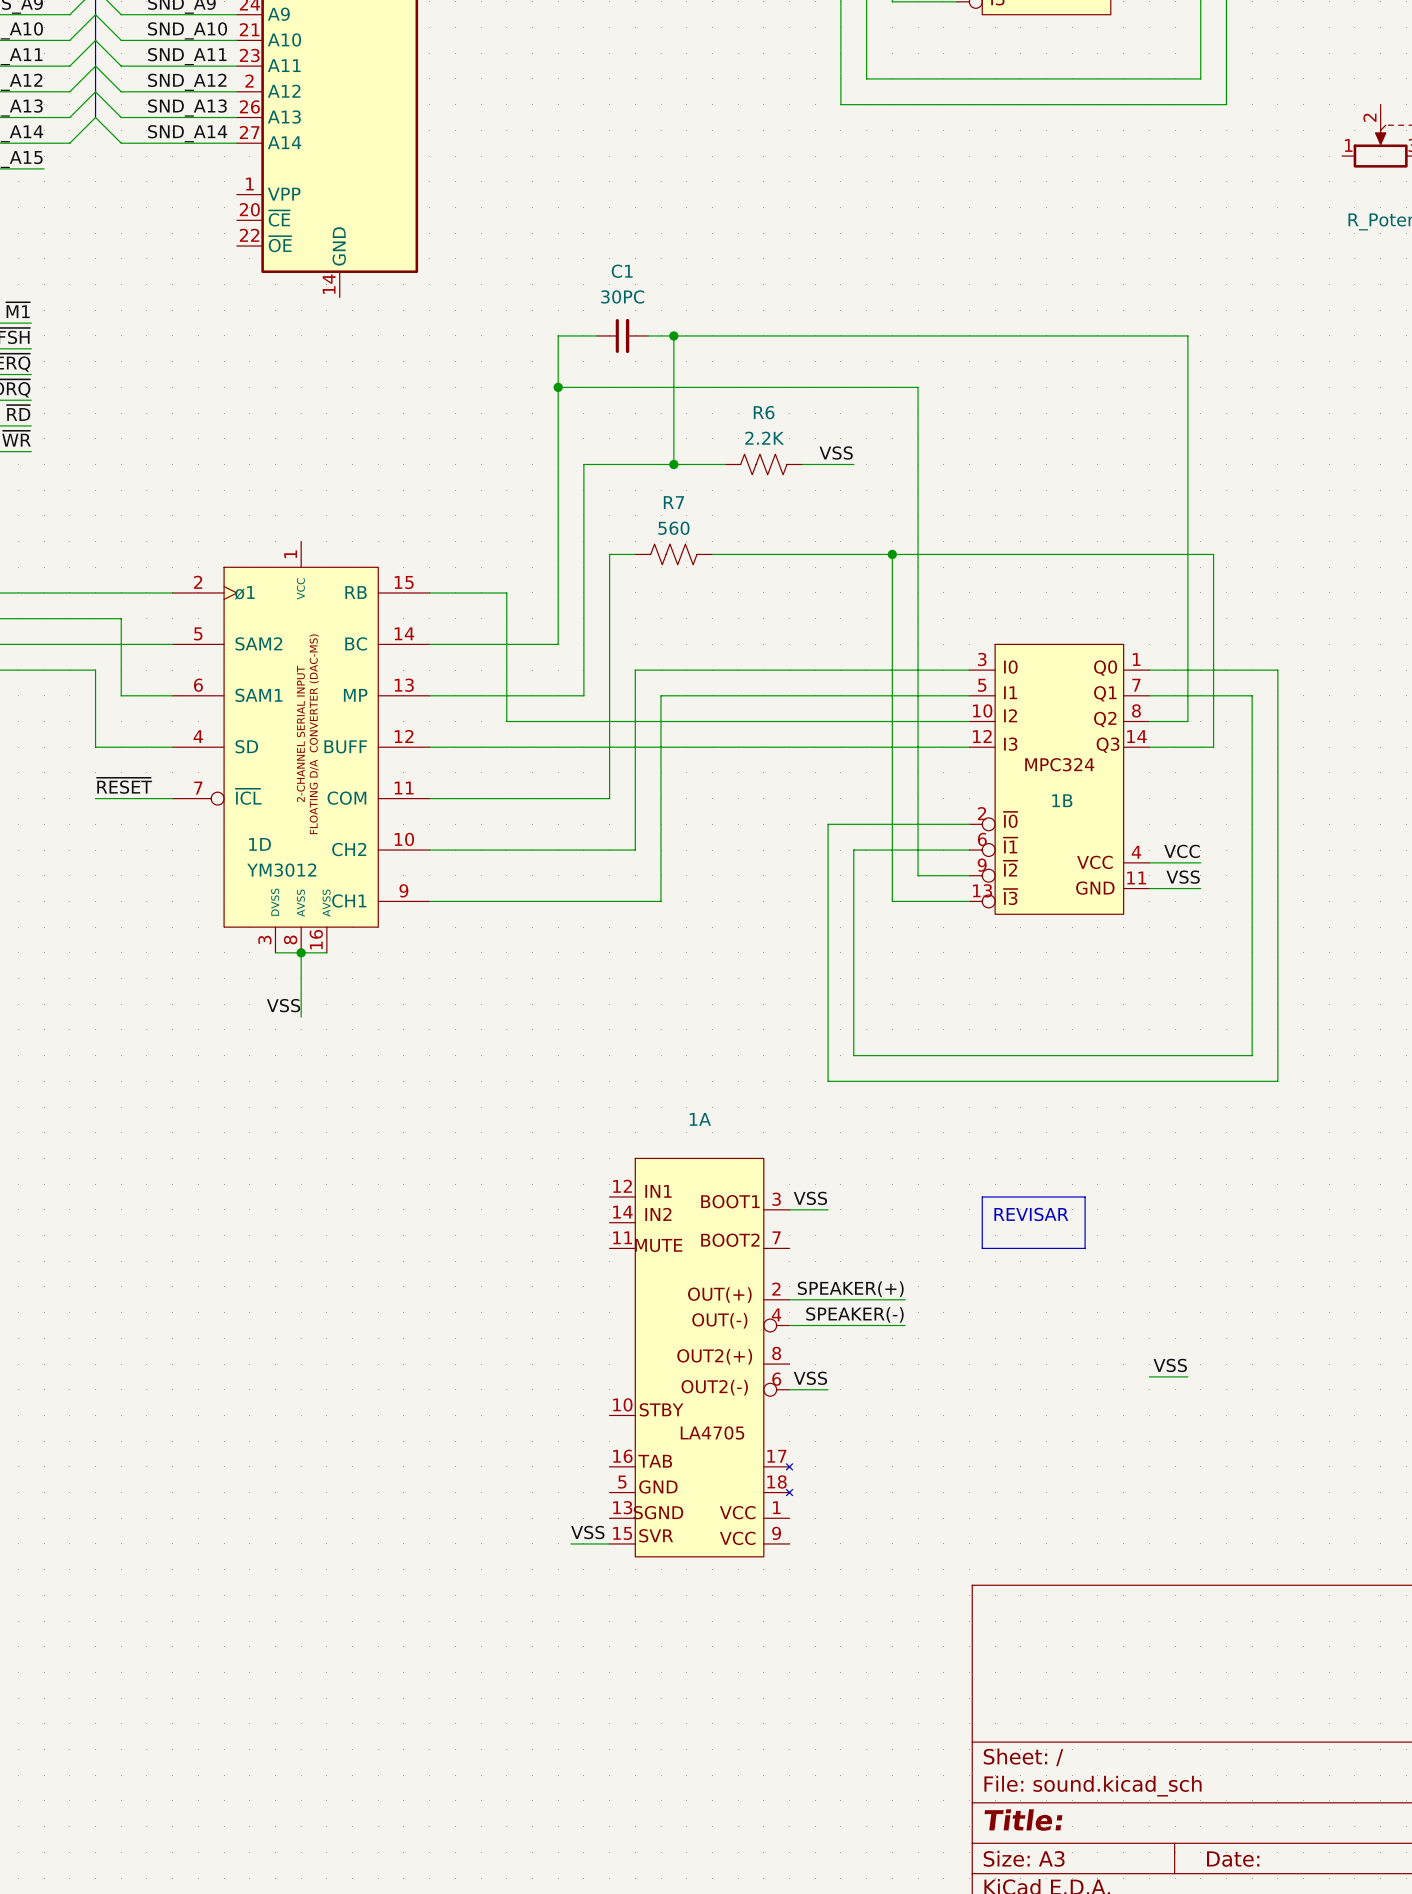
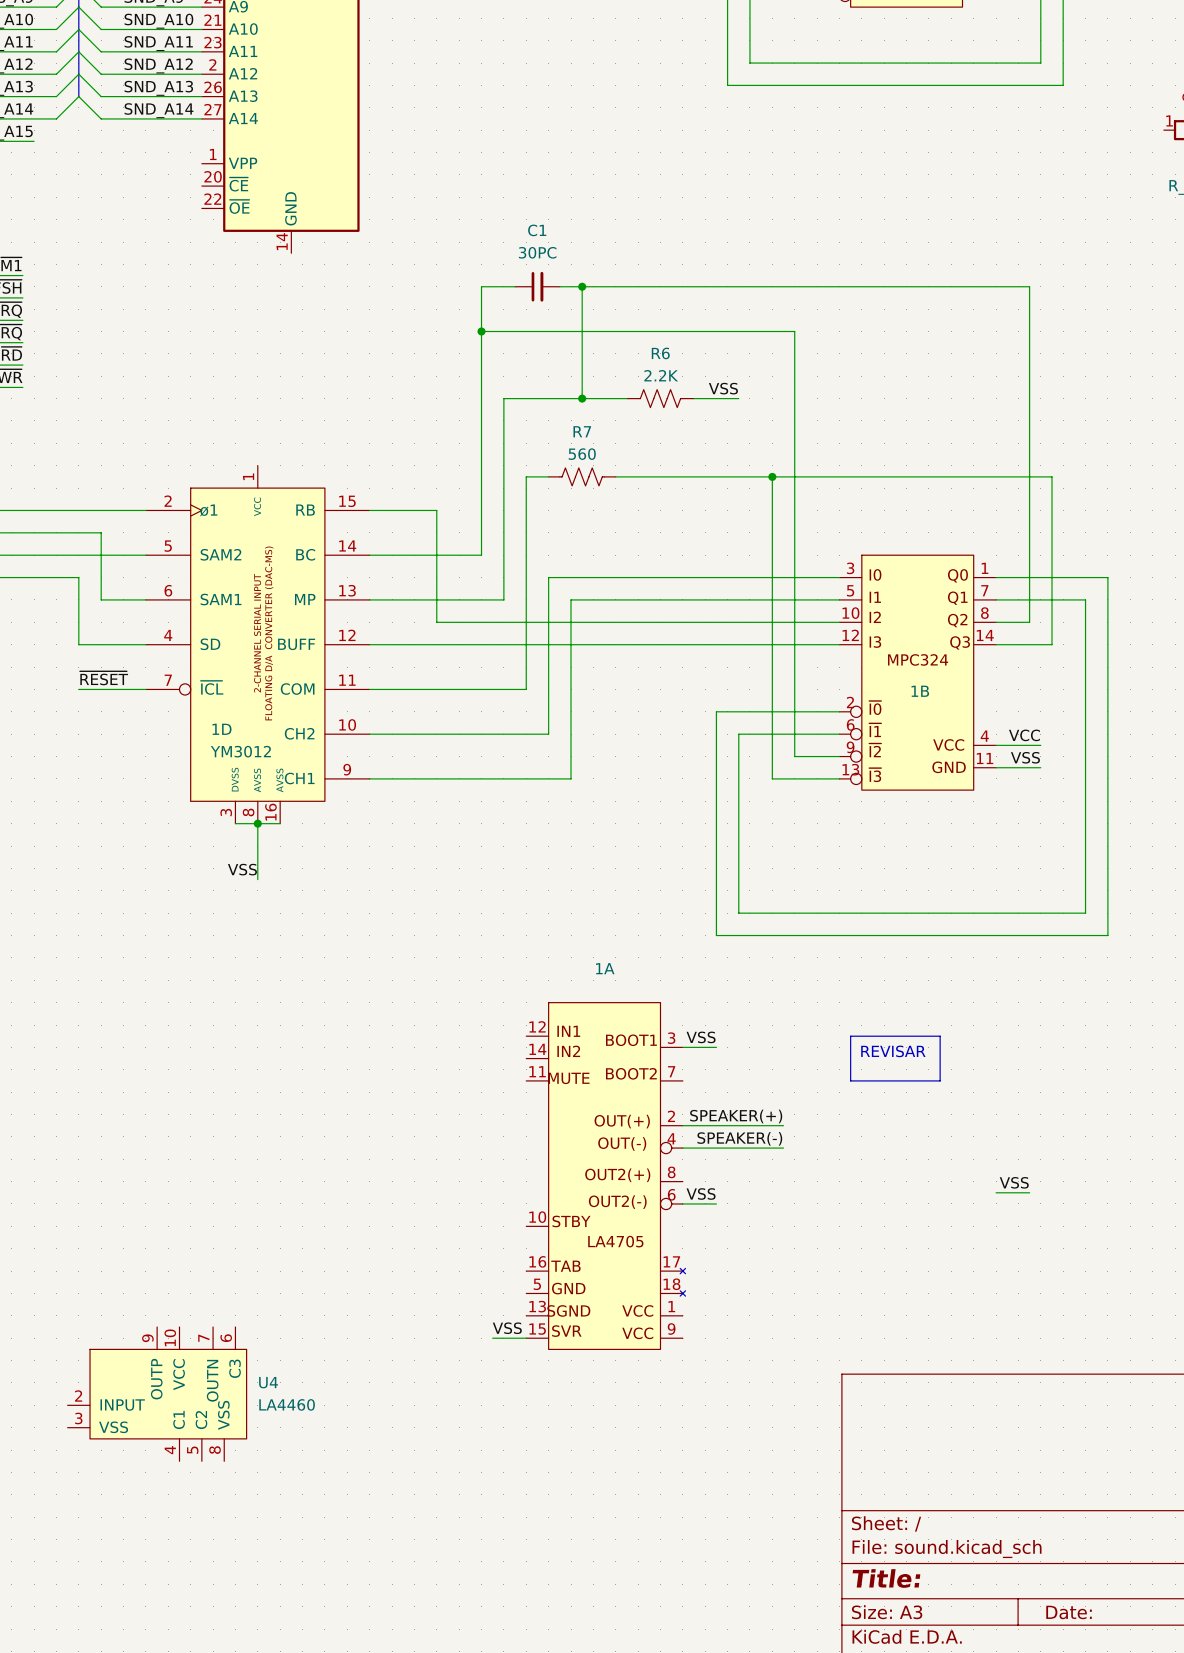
U4: none -> LA4460 (157, 1394)

